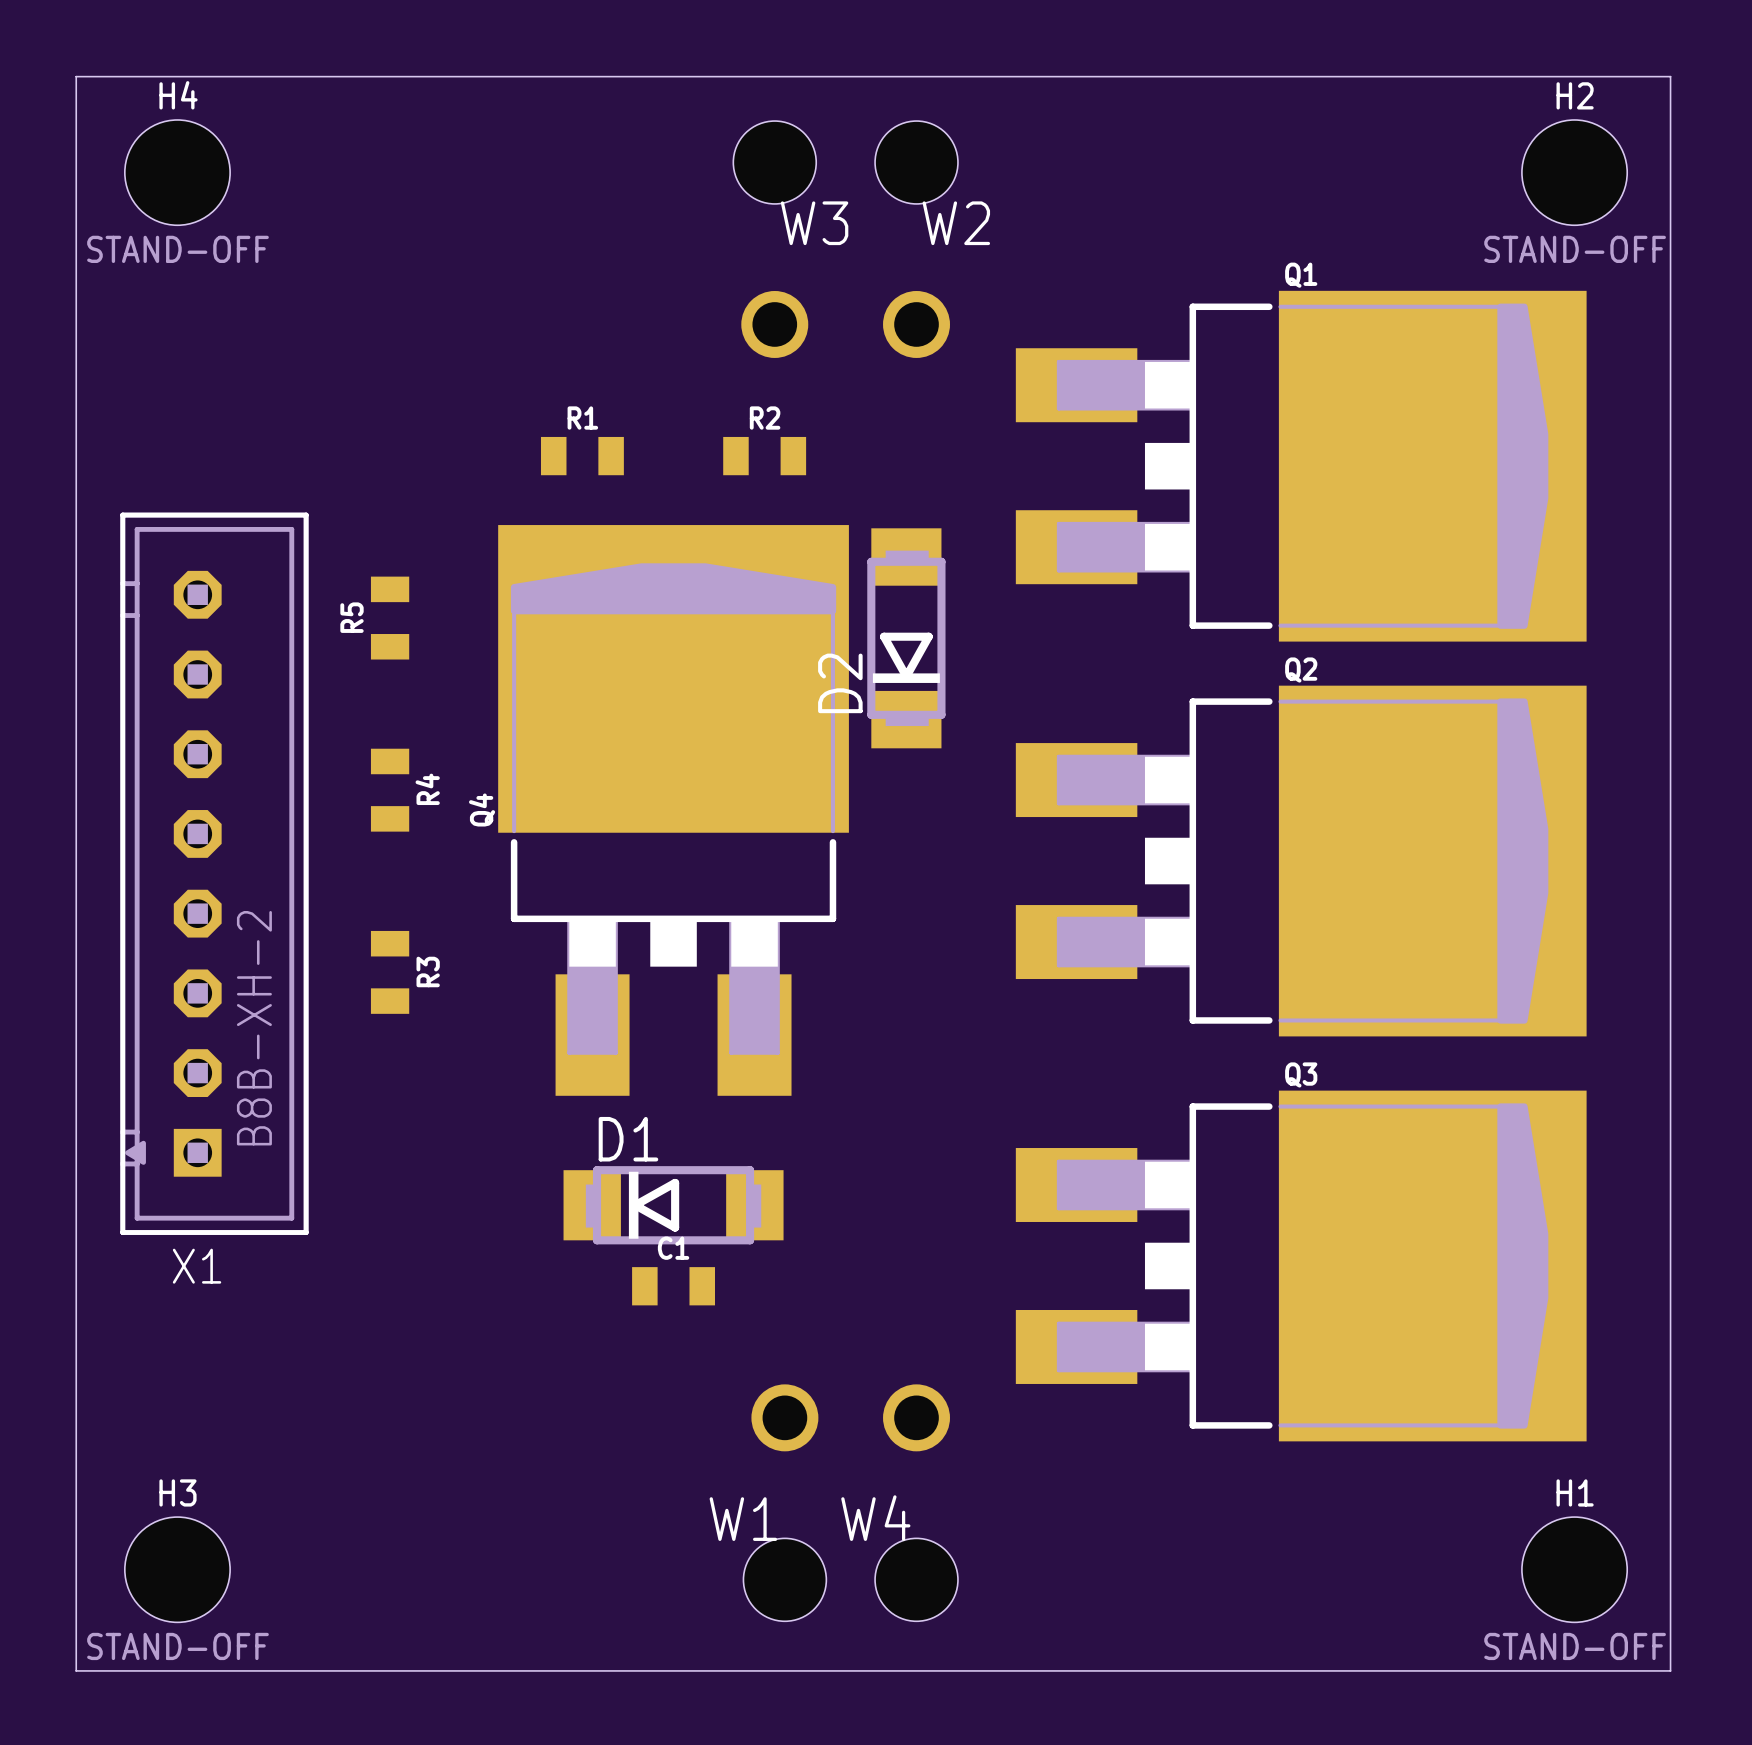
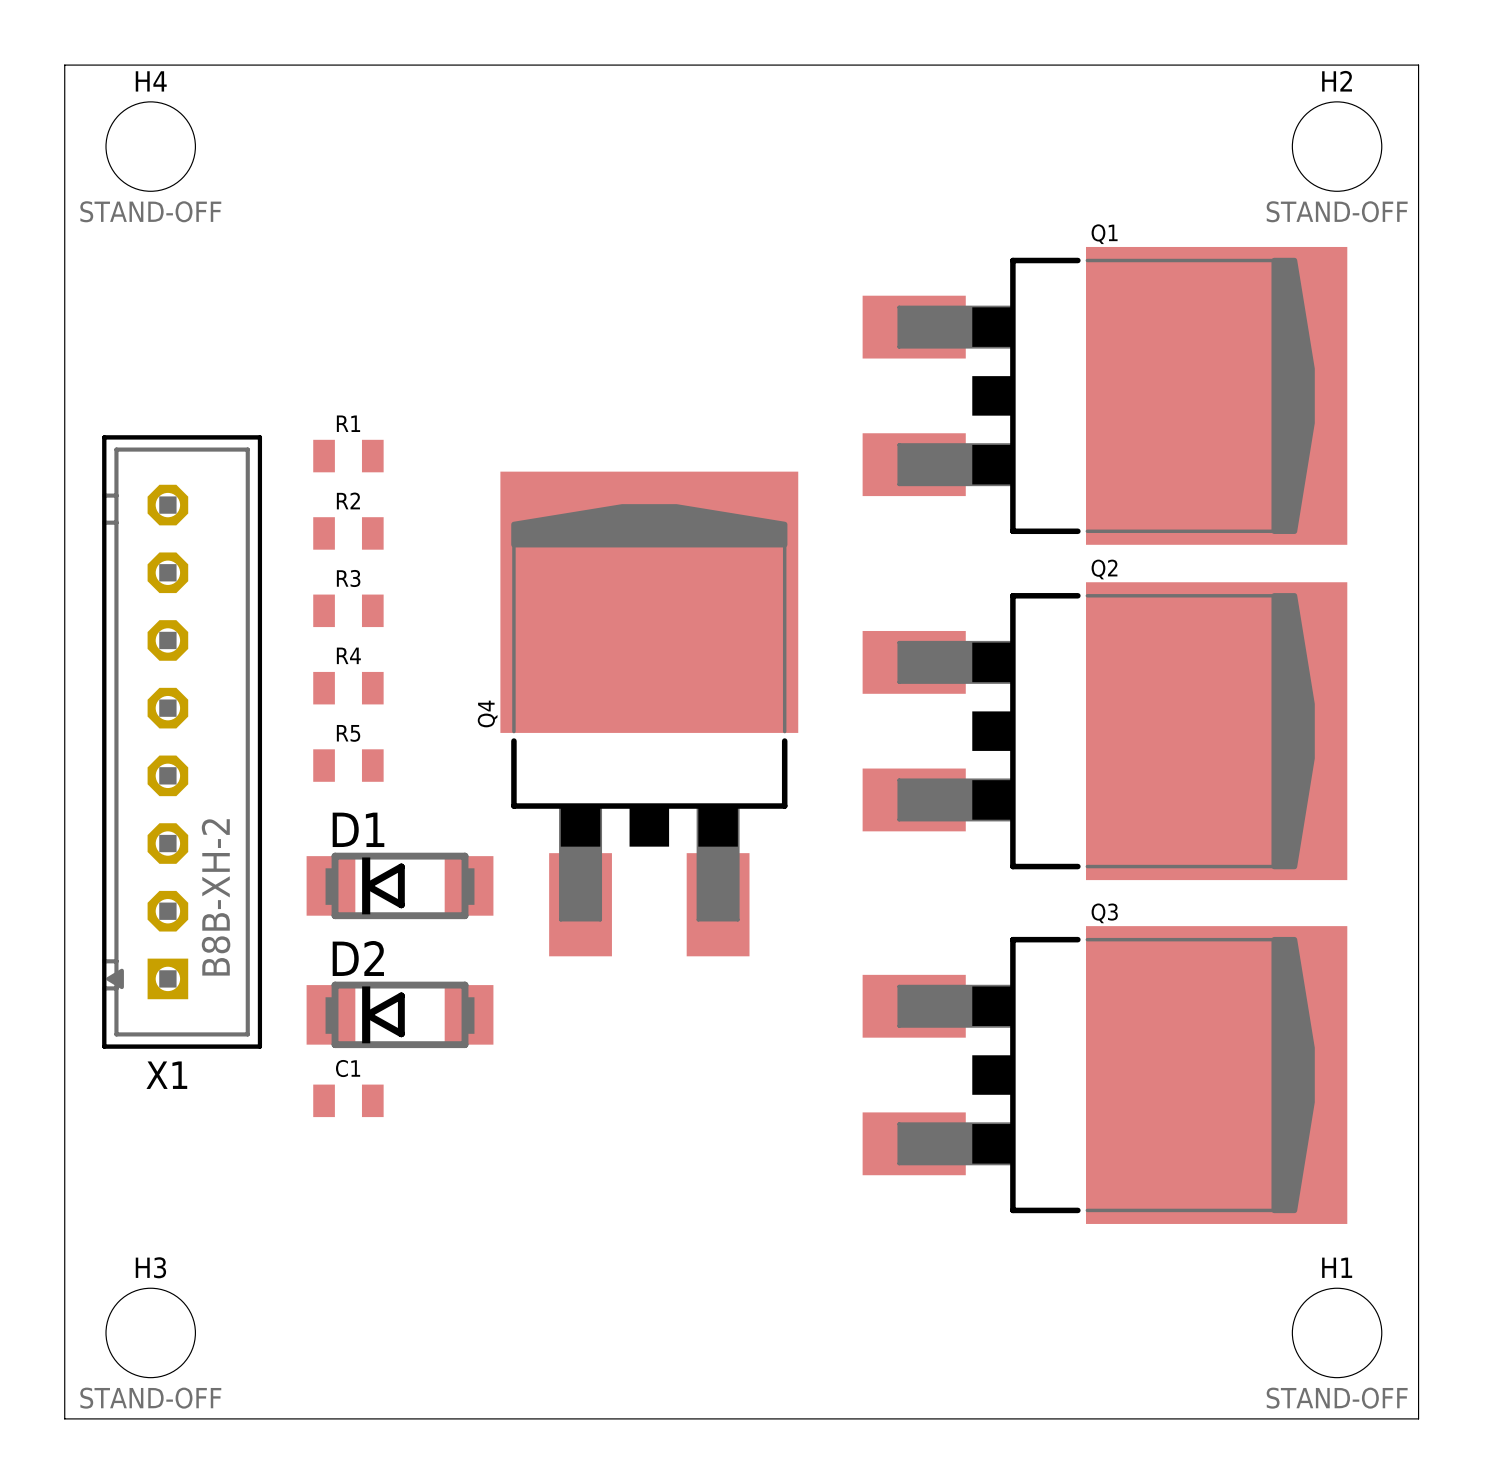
W3: (774, 239) -> none
W2: (916, 239) -> none
R1 position: (582, 456) -> (348, 456)
R2 position: (764, 456) -> (348, 533)
R5 rotation: 0° (390, 618) -> 90° clockwise (348, 765)
R5 position: (390, 618) -> (348, 765)
D2 rotation: 0° (906, 638) -> 90° clockwise (400, 1014)
D2 position: (906, 638) -> (400, 1014)
R4 rotation: 0° (390, 790) -> 90° clockwise (348, 688)
Q4 position: (673, 810) -> (649, 713)
R3 rotation: 0° (390, 972) -> 90° clockwise (348, 610)
R3 position: (390, 972) -> (348, 610)
D1 position: (673, 1205) -> (400, 885)
C1 position: (673, 1286) -> (348, 1100)
W1: (784, 1502) -> none
W4: (916, 1502) -> none

